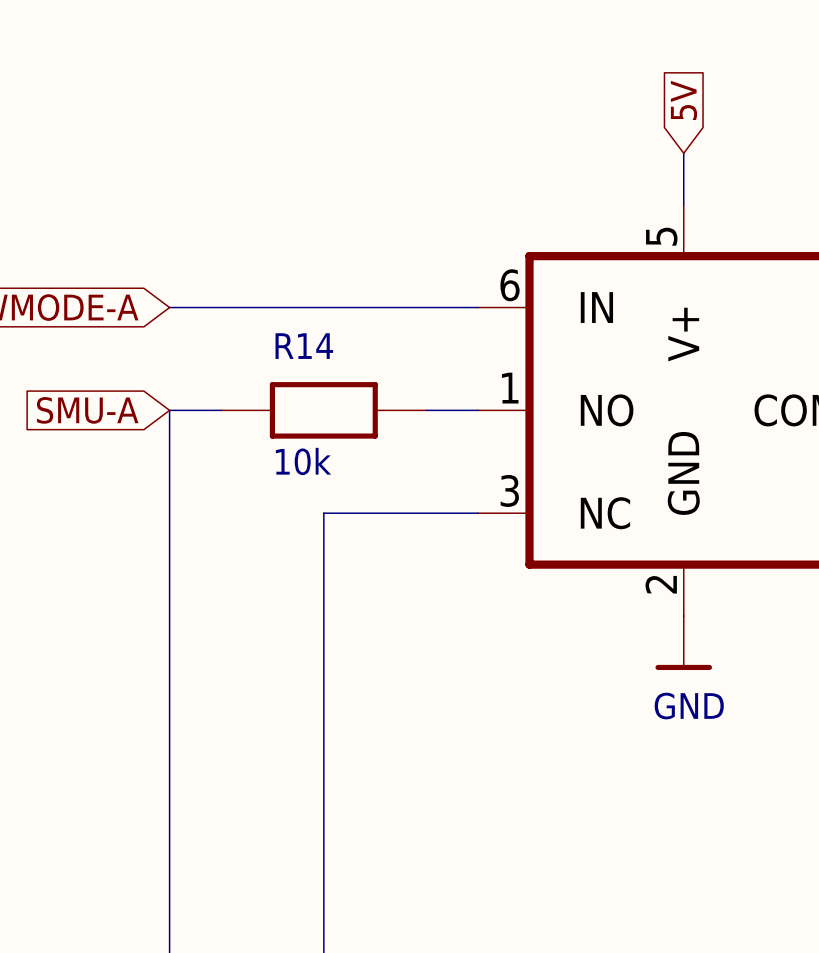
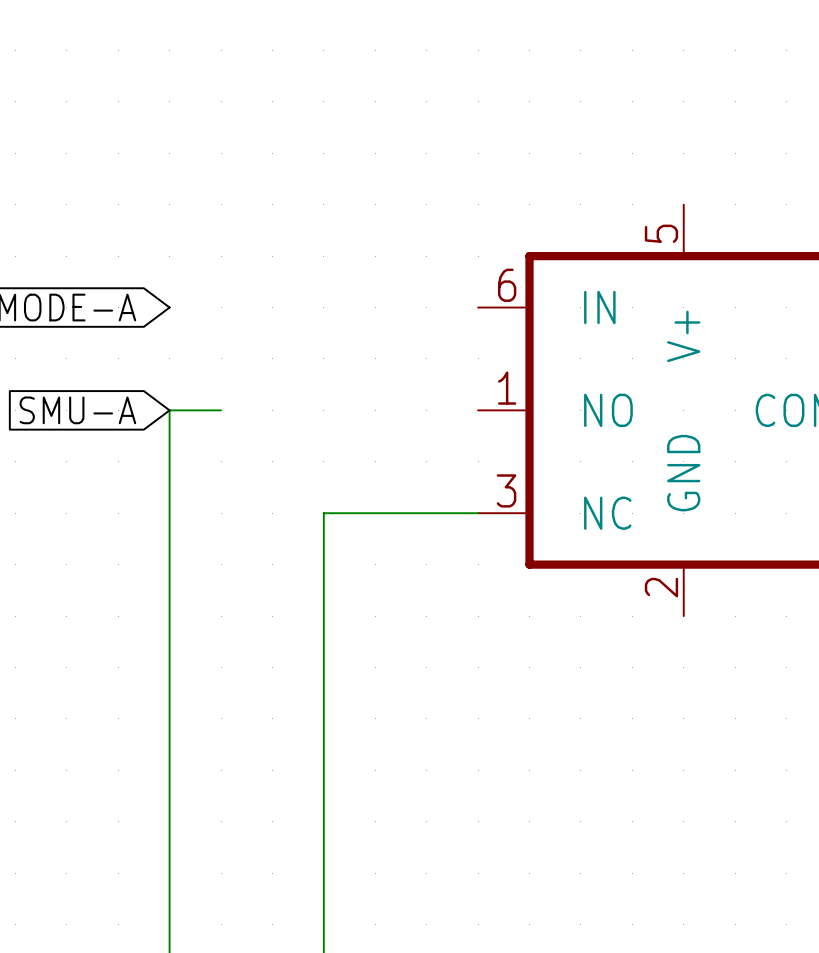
global label: 5V (684, 100) -> none
wire: (683, 153) (683, 204) -> none
wire: (169, 307) (478, 307) -> none
R14: 10k (323, 410) -> none
wire: (426, 410) (478, 410) -> none
power symbol: GND (683, 643) -> none

